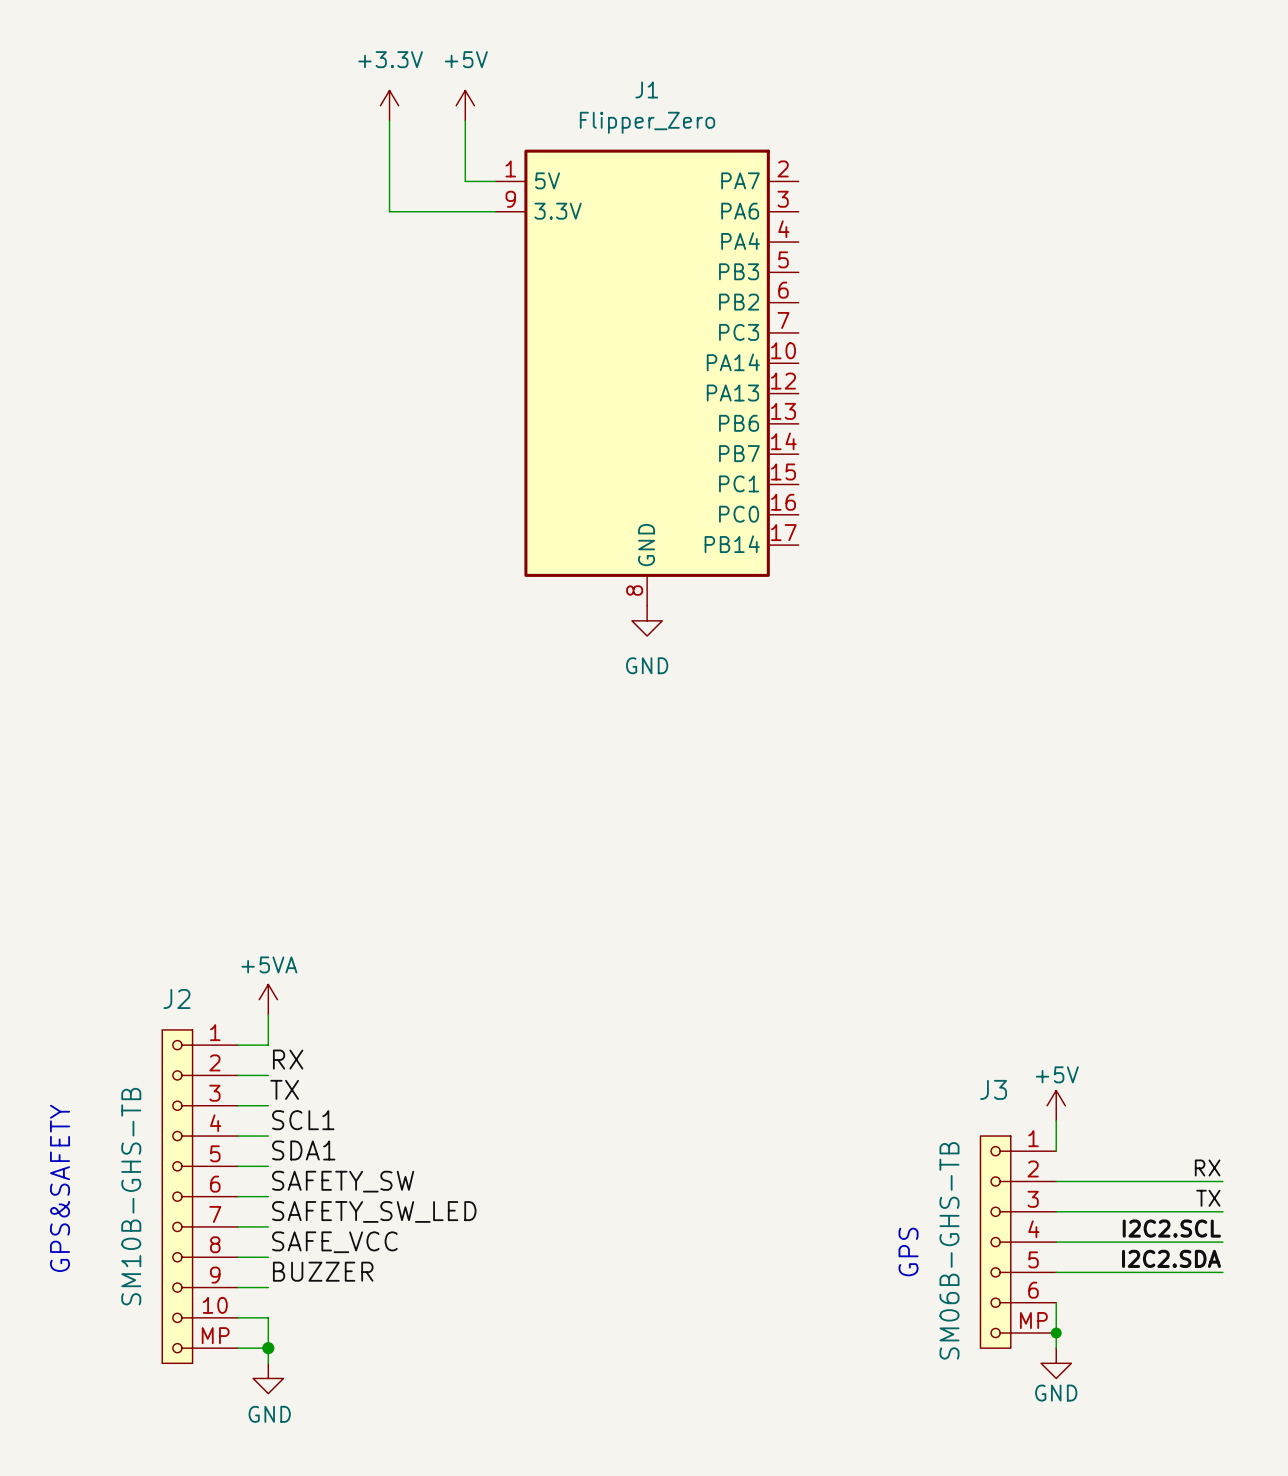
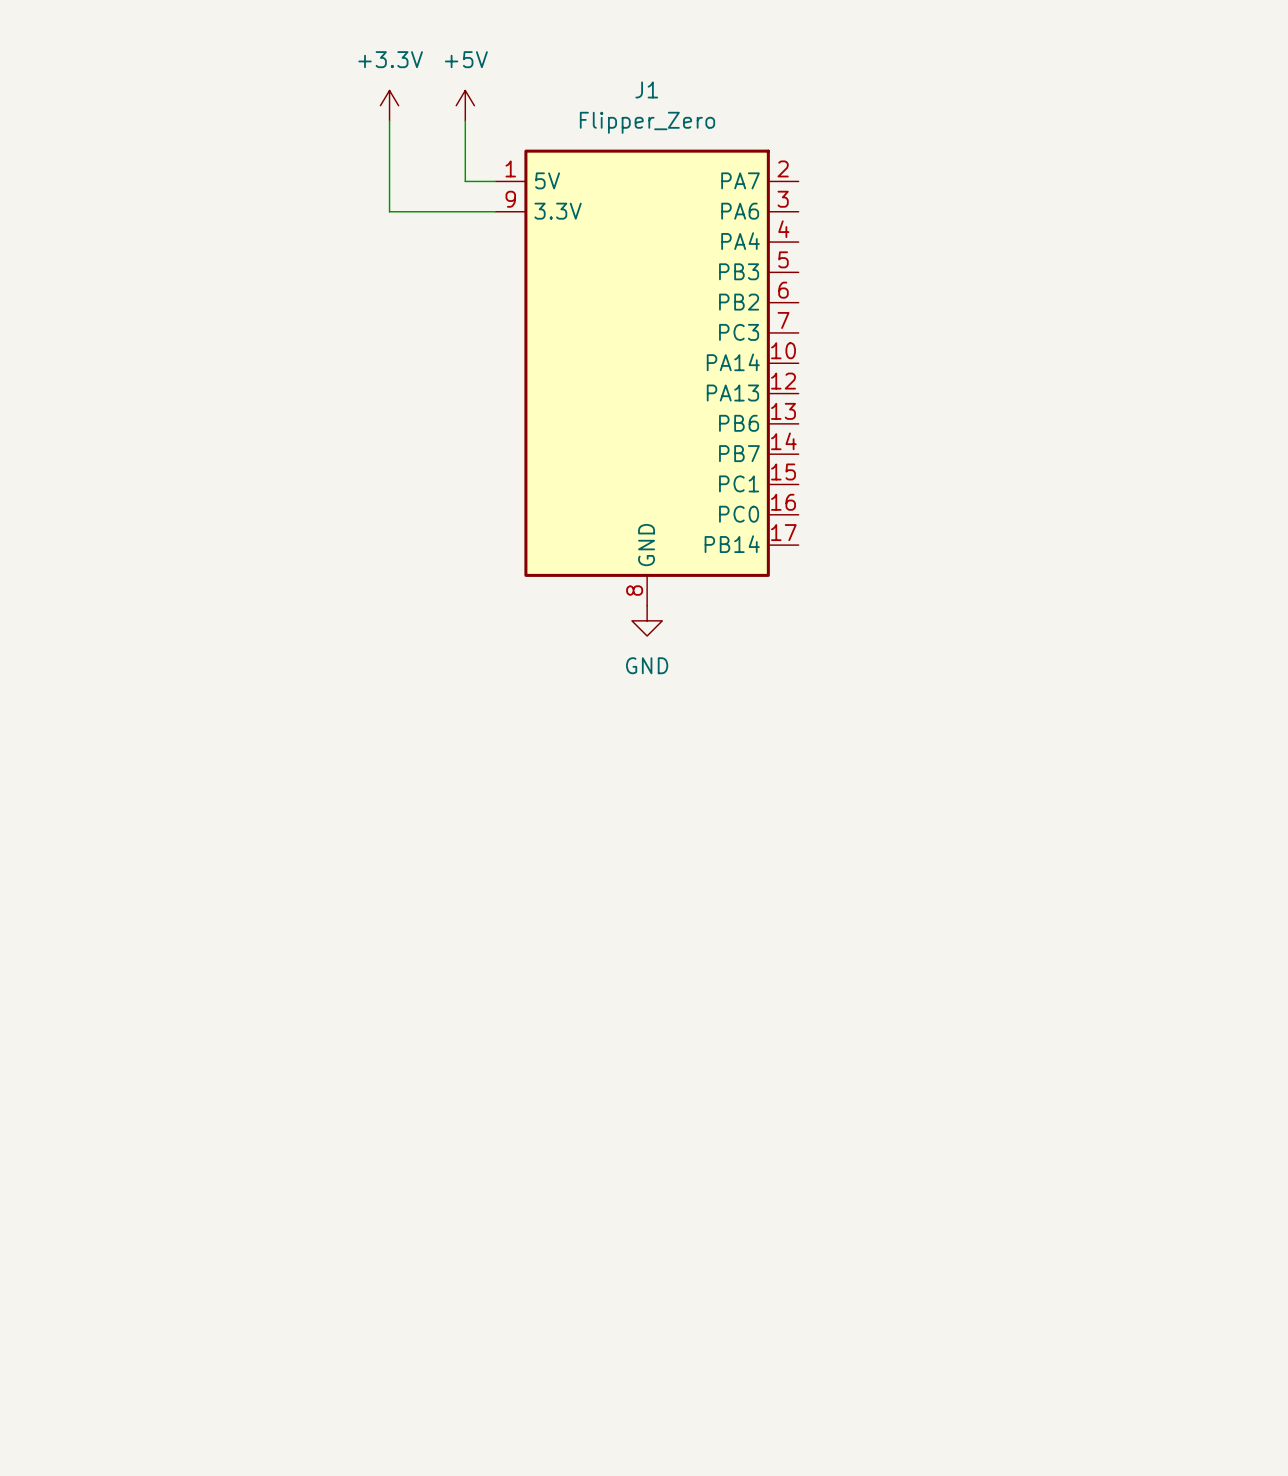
power symbol: +5VA (268, 999) -> none
wire: (268, 1014) (268, 1045) (238, 1045) -> none
label: RX (288, 1059) -> none
wire: (238, 1075) (268, 1075) -> none
label: TX (284, 1089) -> none
wire: (238, 1105) (268, 1105) -> none
power symbol: +5V (1056, 1105) -> none
label: SCL1 (303, 1120) -> none
wire: (1056, 1120) (1056, 1151) -> none
wire: (238, 1136) (268, 1136) -> none
label: SDA1 (303, 1150) -> none
wire: (238, 1166) (268, 1166) -> none
label: RX (1207, 1167) -> none
label: SAFETY_SW (343, 1181) -> none
wire: (1056, 1181) (1222, 1181) -> none
text: GPS&SAFETY (60, 1188) -> none
J2: SM10B-GHS-TB (200, 1196) -> none
wire: (238, 1196) (268, 1196) -> none
label: TX (1208, 1198) -> none
label: SAFETY_SW_LED (374, 1211) -> none
wire: (1056, 1211) (1222, 1211) -> none
wire: (238, 1226) (268, 1226) -> none
label: I2C2.SCL (1171, 1228) -> none
label: SAFE_VCC (334, 1242) -> none
J3: SM06B-GHS-TB (1018, 1242) -> none
wire: (1056, 1242) (1222, 1242) -> none
text: GPS (908, 1252) -> none
wire: (238, 1257) (268, 1257) -> none
label: I2C2.SDA (1171, 1258) -> none
label: BUZZER (323, 1271) -> none
wire: (1056, 1272) (1222, 1272) -> none
wire: (238, 1287) (268, 1287) -> none
wire: (1056, 1302) (1056, 1348) -> none
wire: (238, 1317) (268, 1317) (268, 1363) -> none
junction: (1056, 1333) -> none
wire: (238, 1348) (268, 1348) -> none
junction: (268, 1348) -> none
power symbol: GND (1056, 1363) -> none
power symbol: GND (268, 1378) -> none

